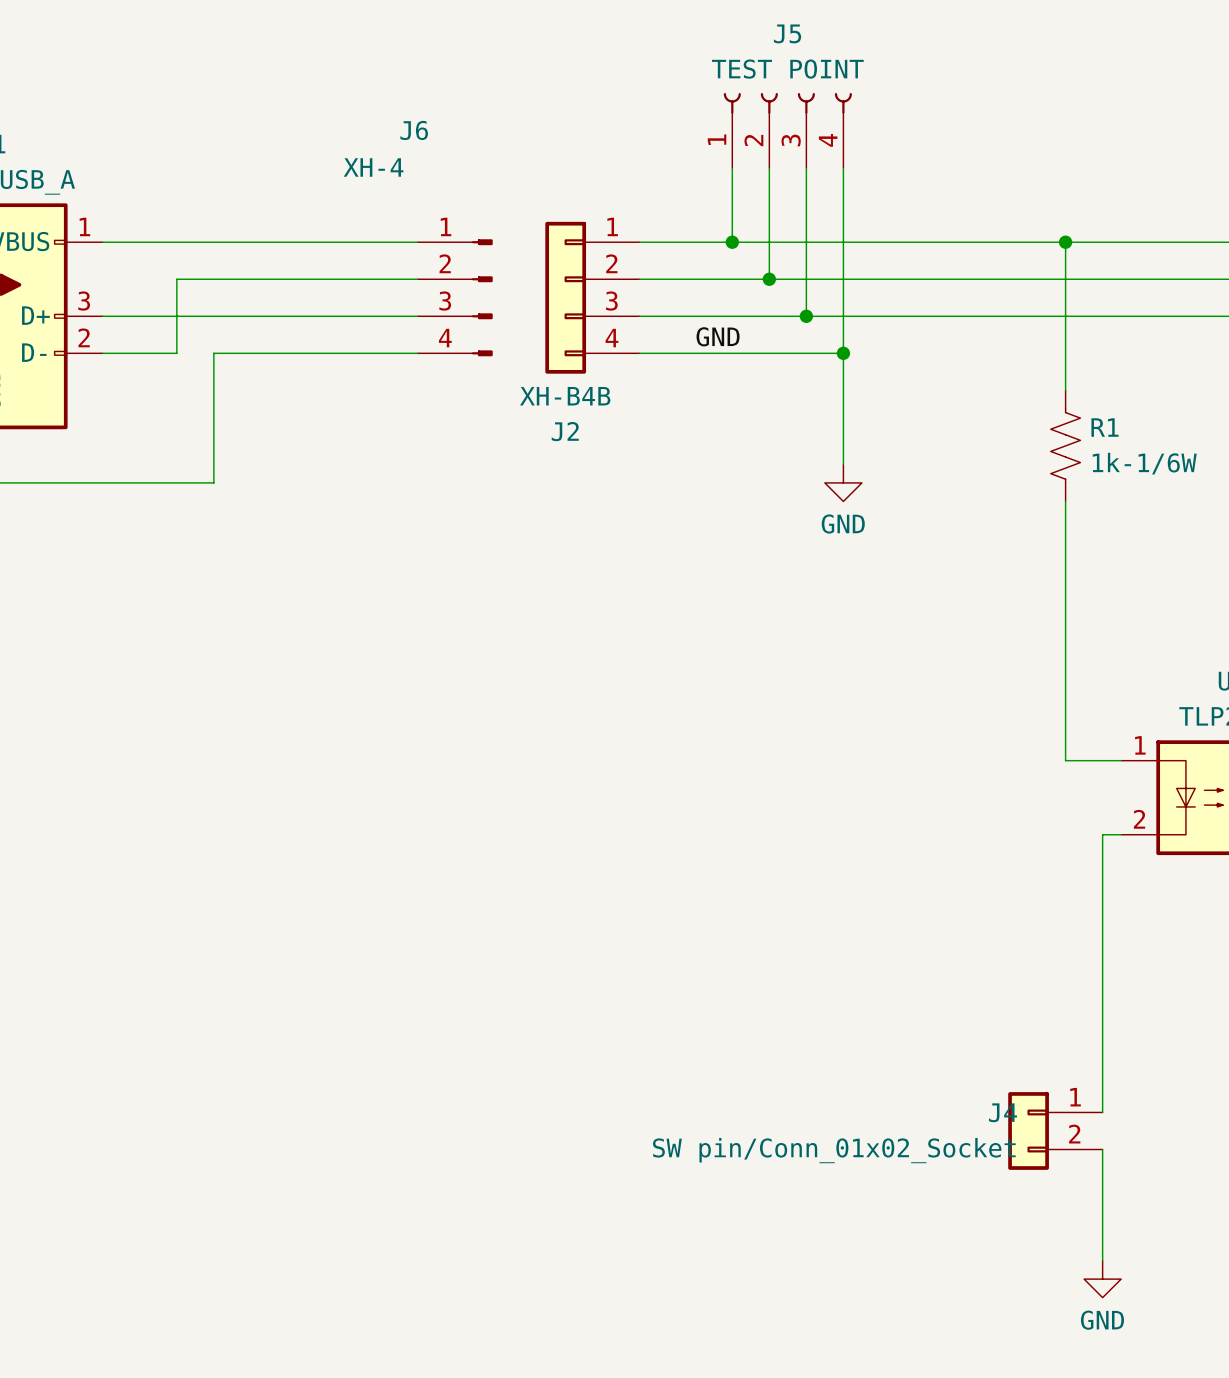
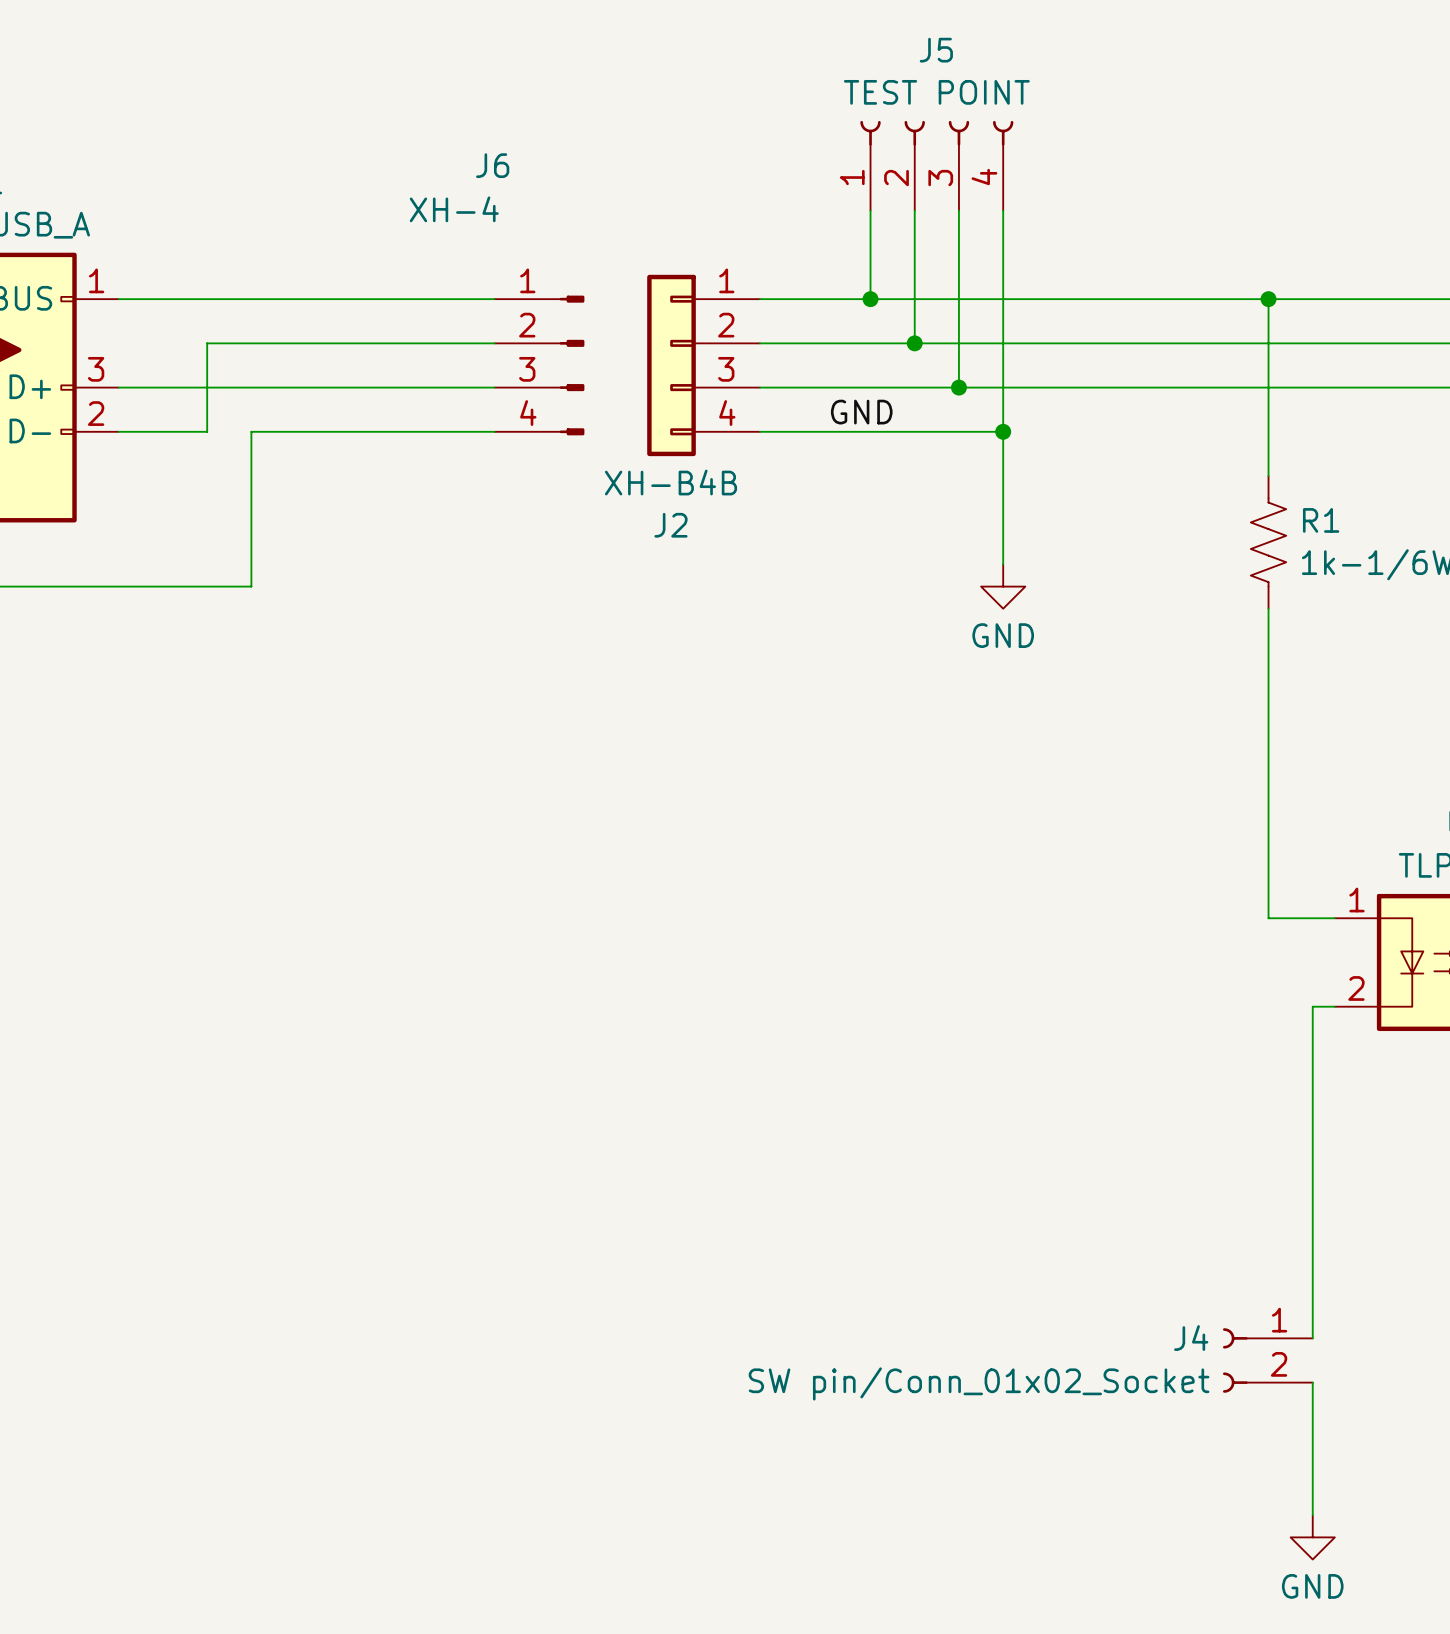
J4 symbol: [1008, 1092, 1103, 1170] -> [1222, 1328, 1313, 1393]

